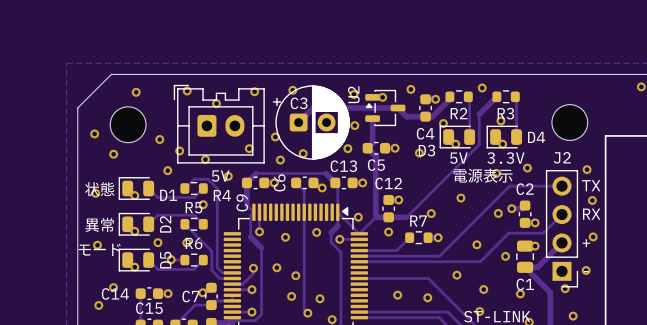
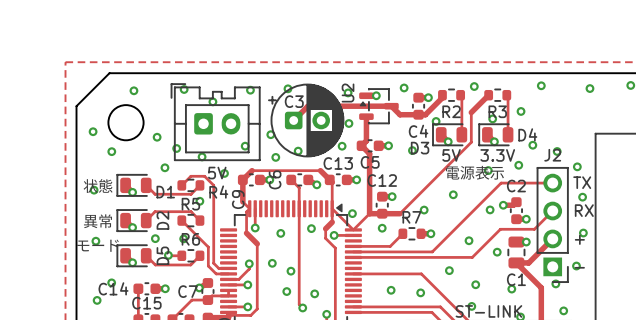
via: none -> (541, 85)
via: none -> (589, 88)
via: none -> (521, 111)
part: (569, 122) -> none
via: none -> (532, 145)
via: none -> (557, 151)

